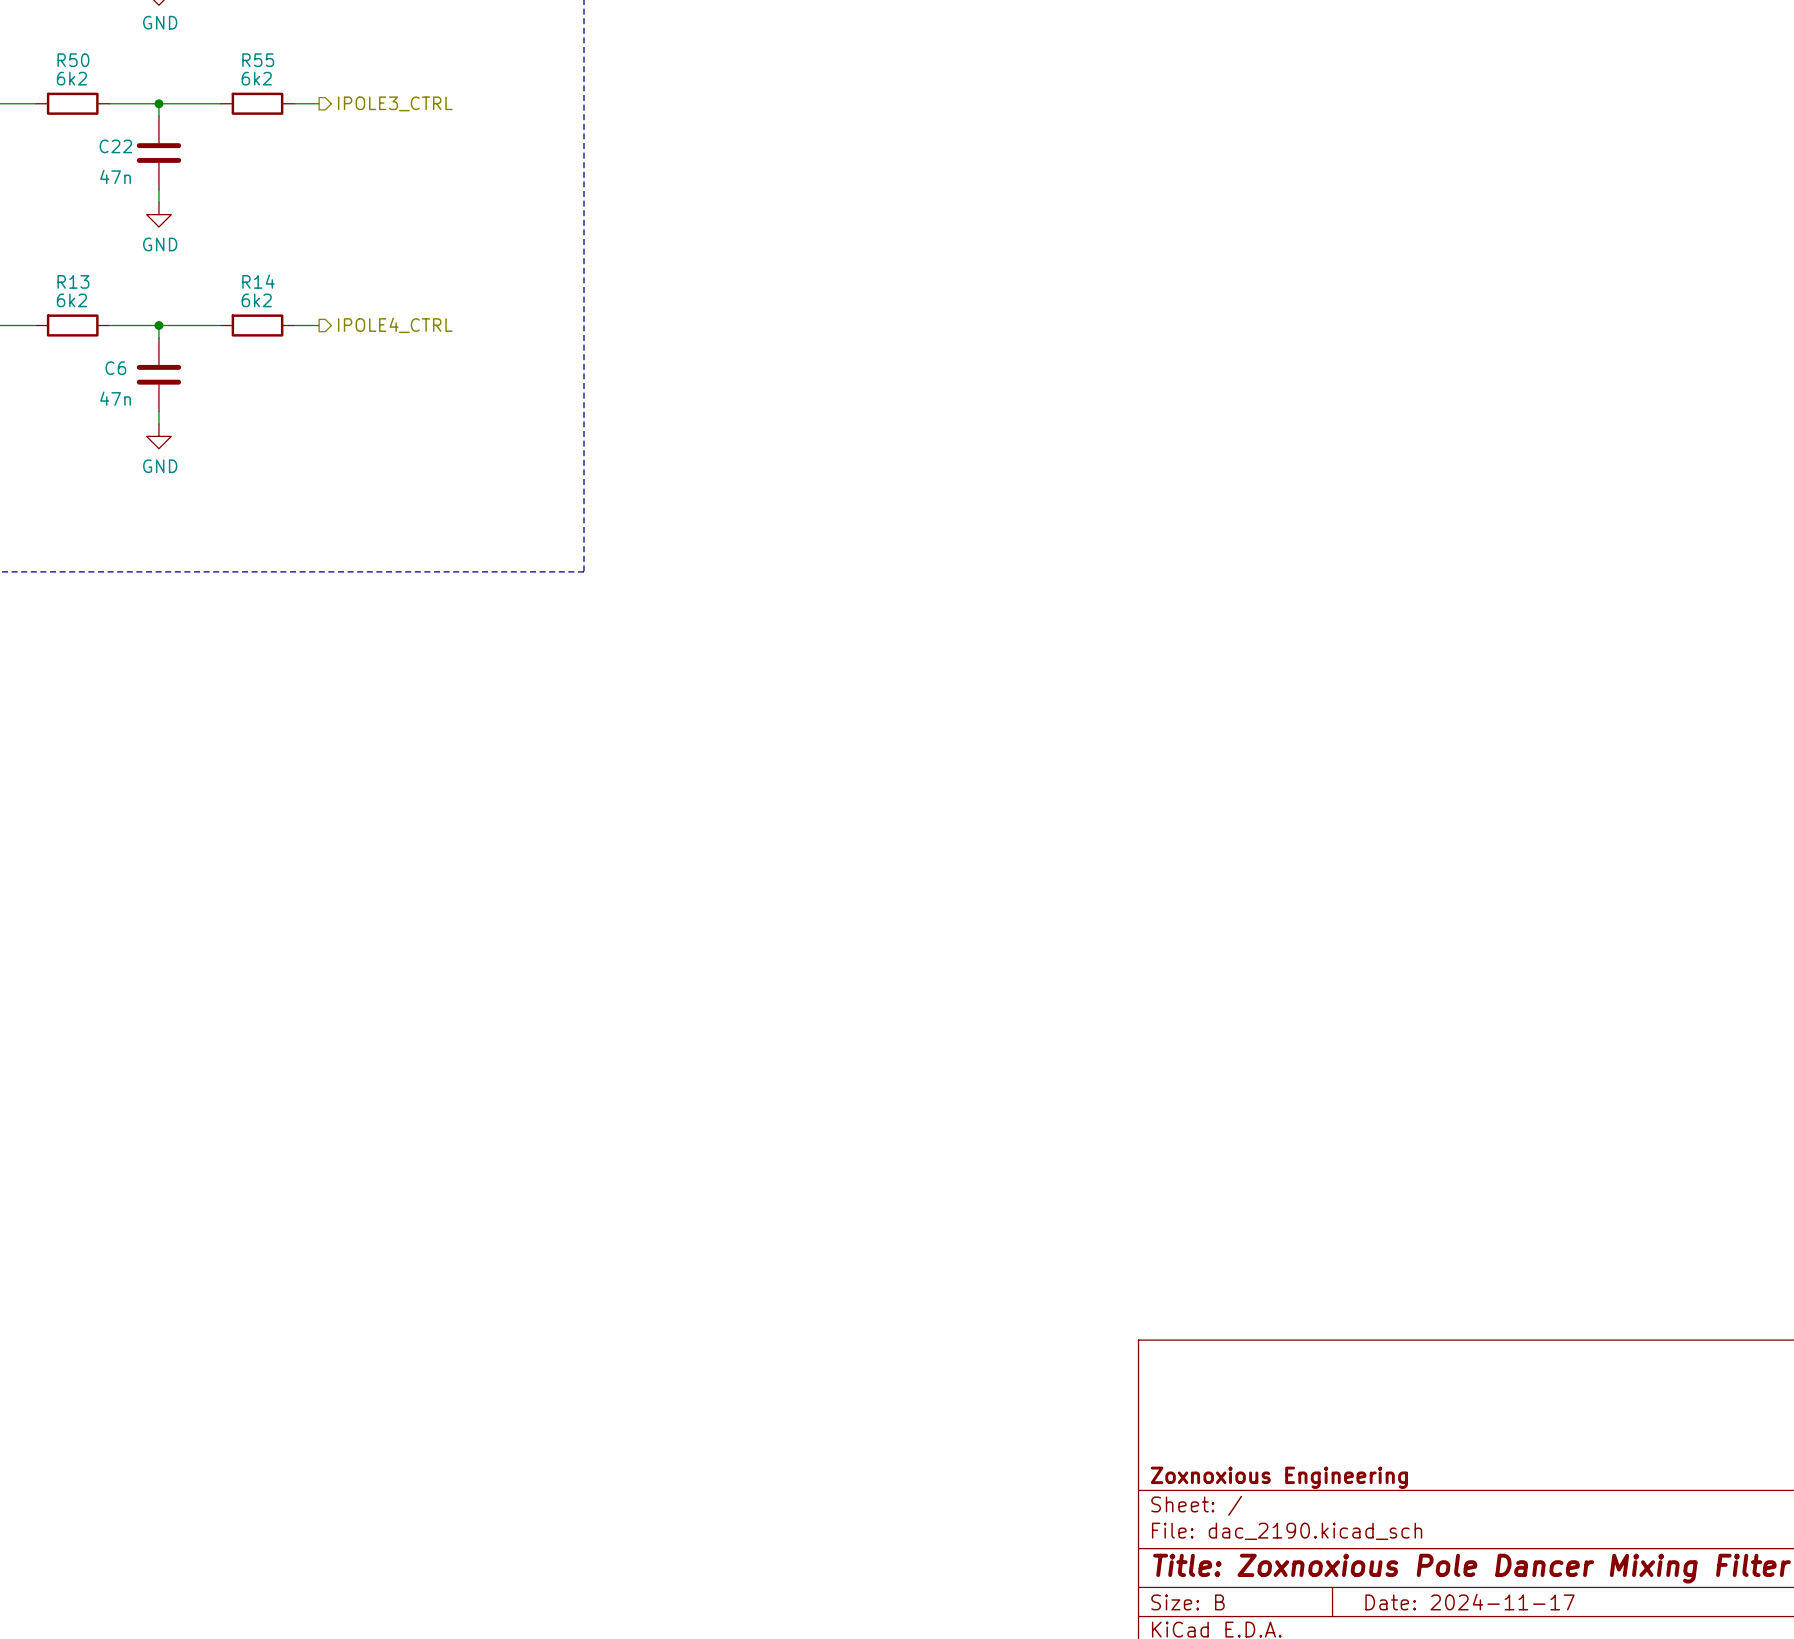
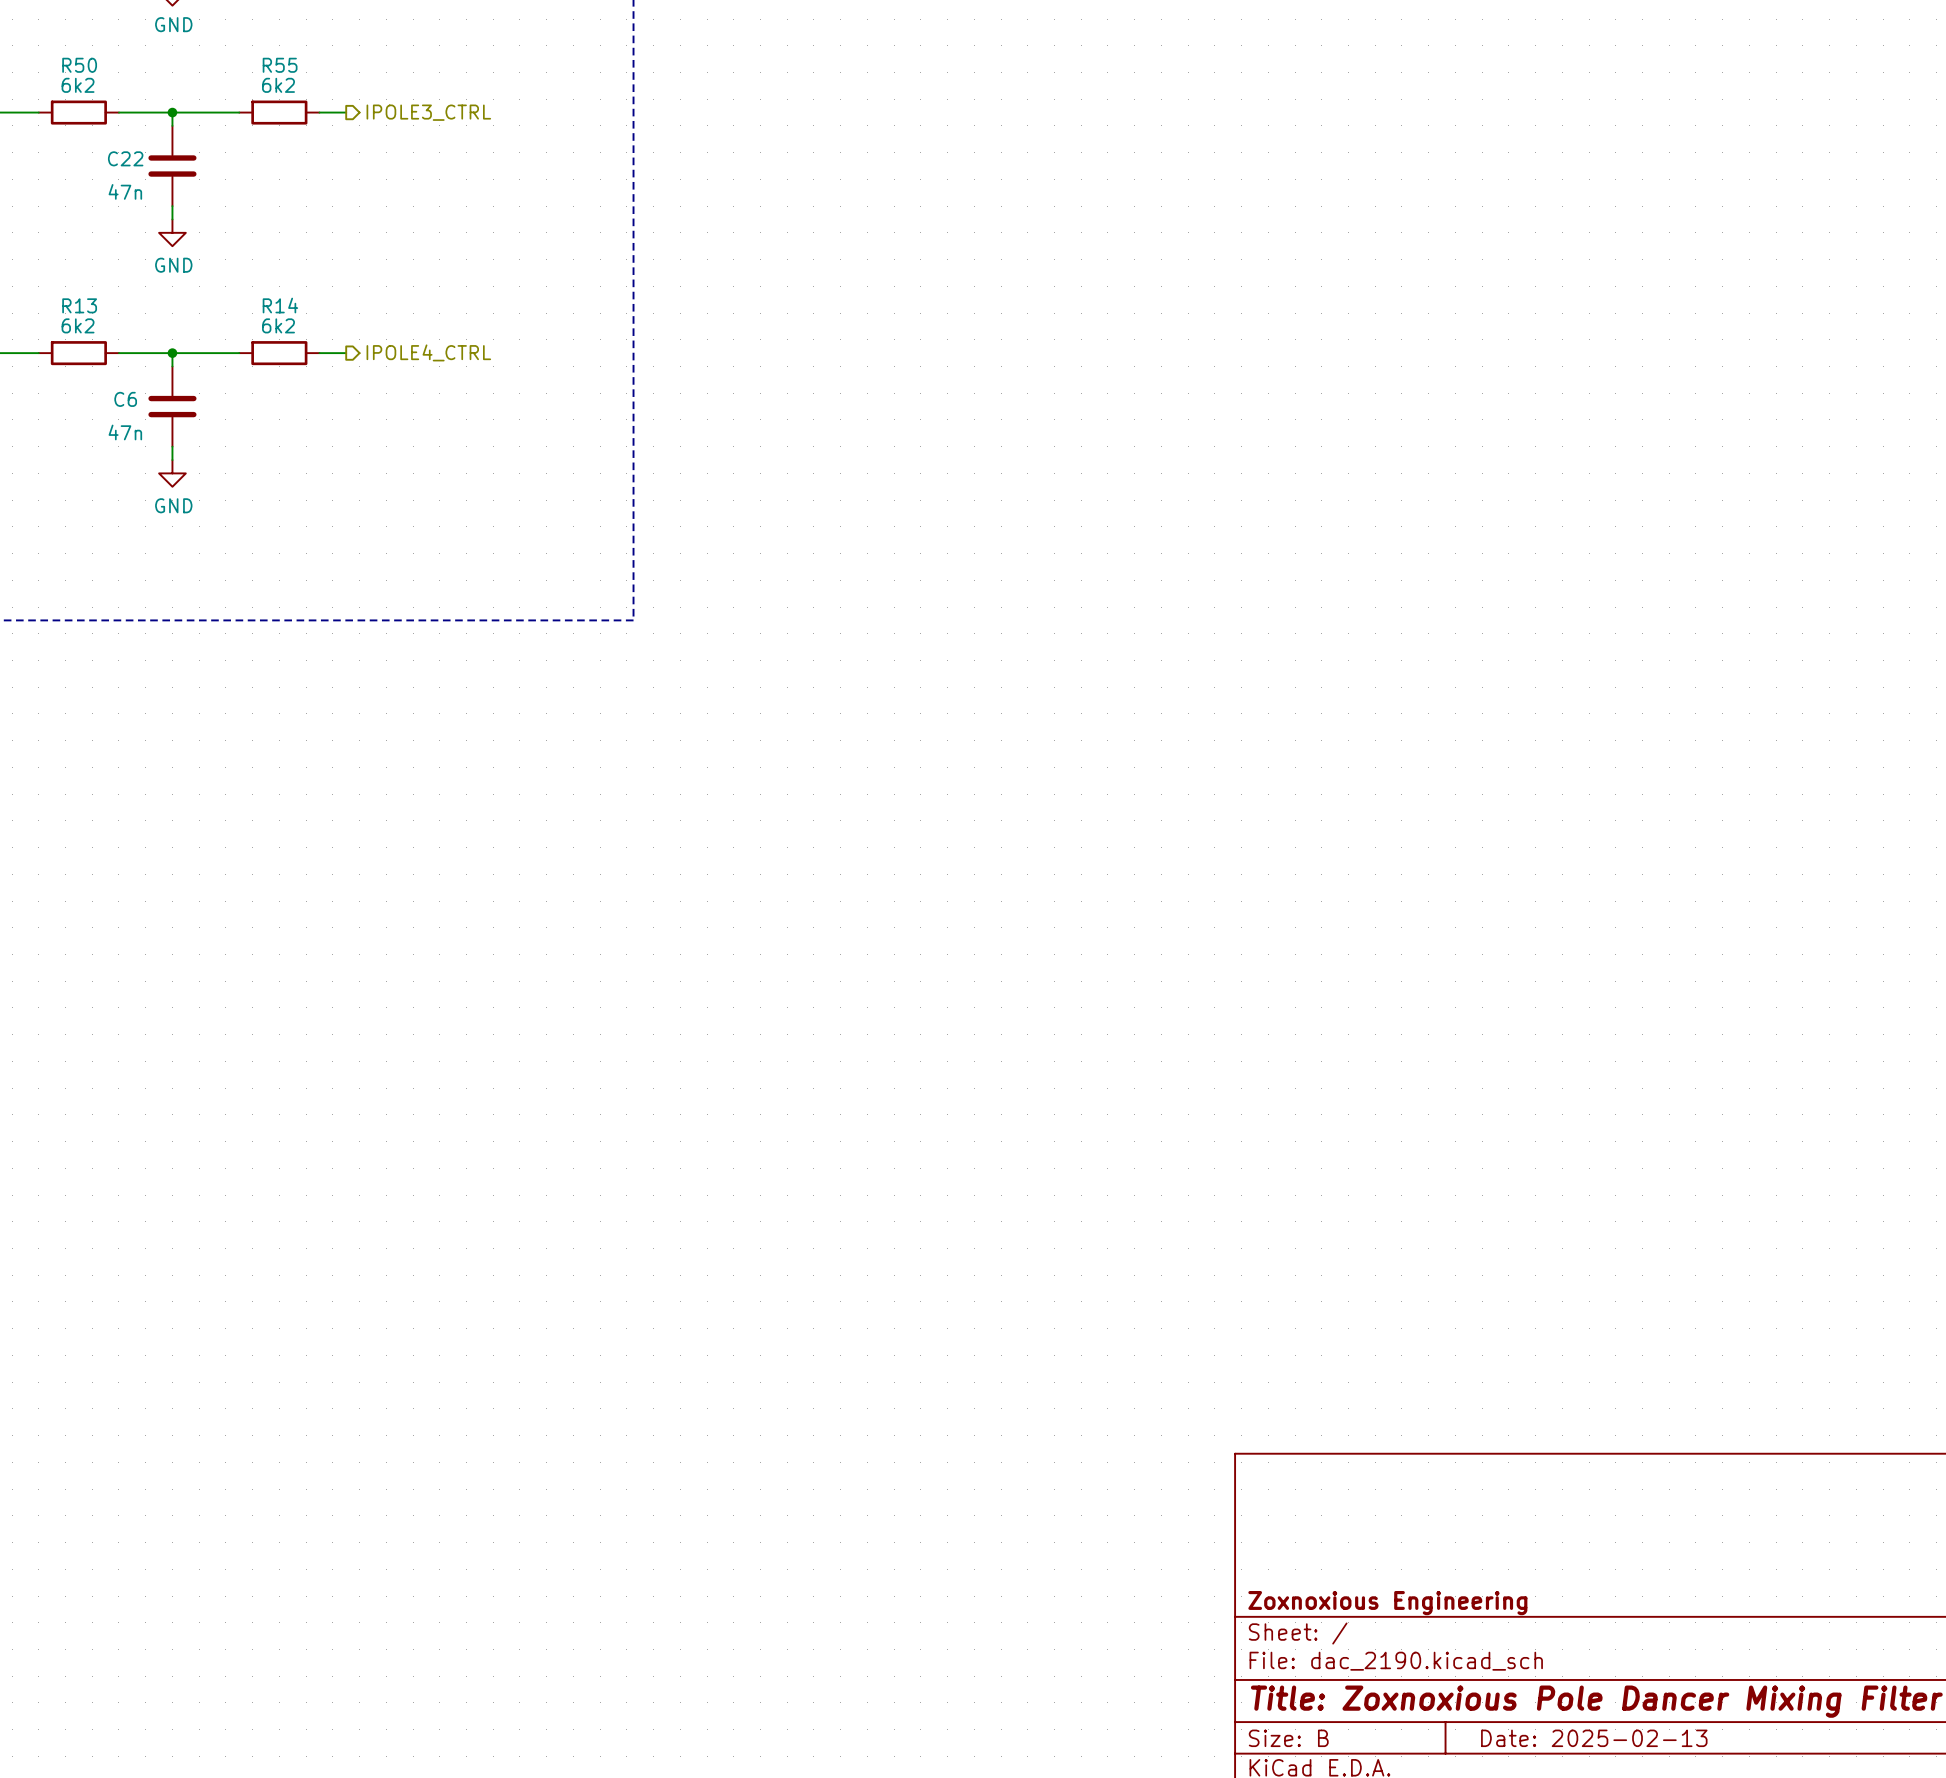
title block: Date: 2024-11-17 (1470, 1602) -> Date: 2025-02-13 (1594, 1738)

